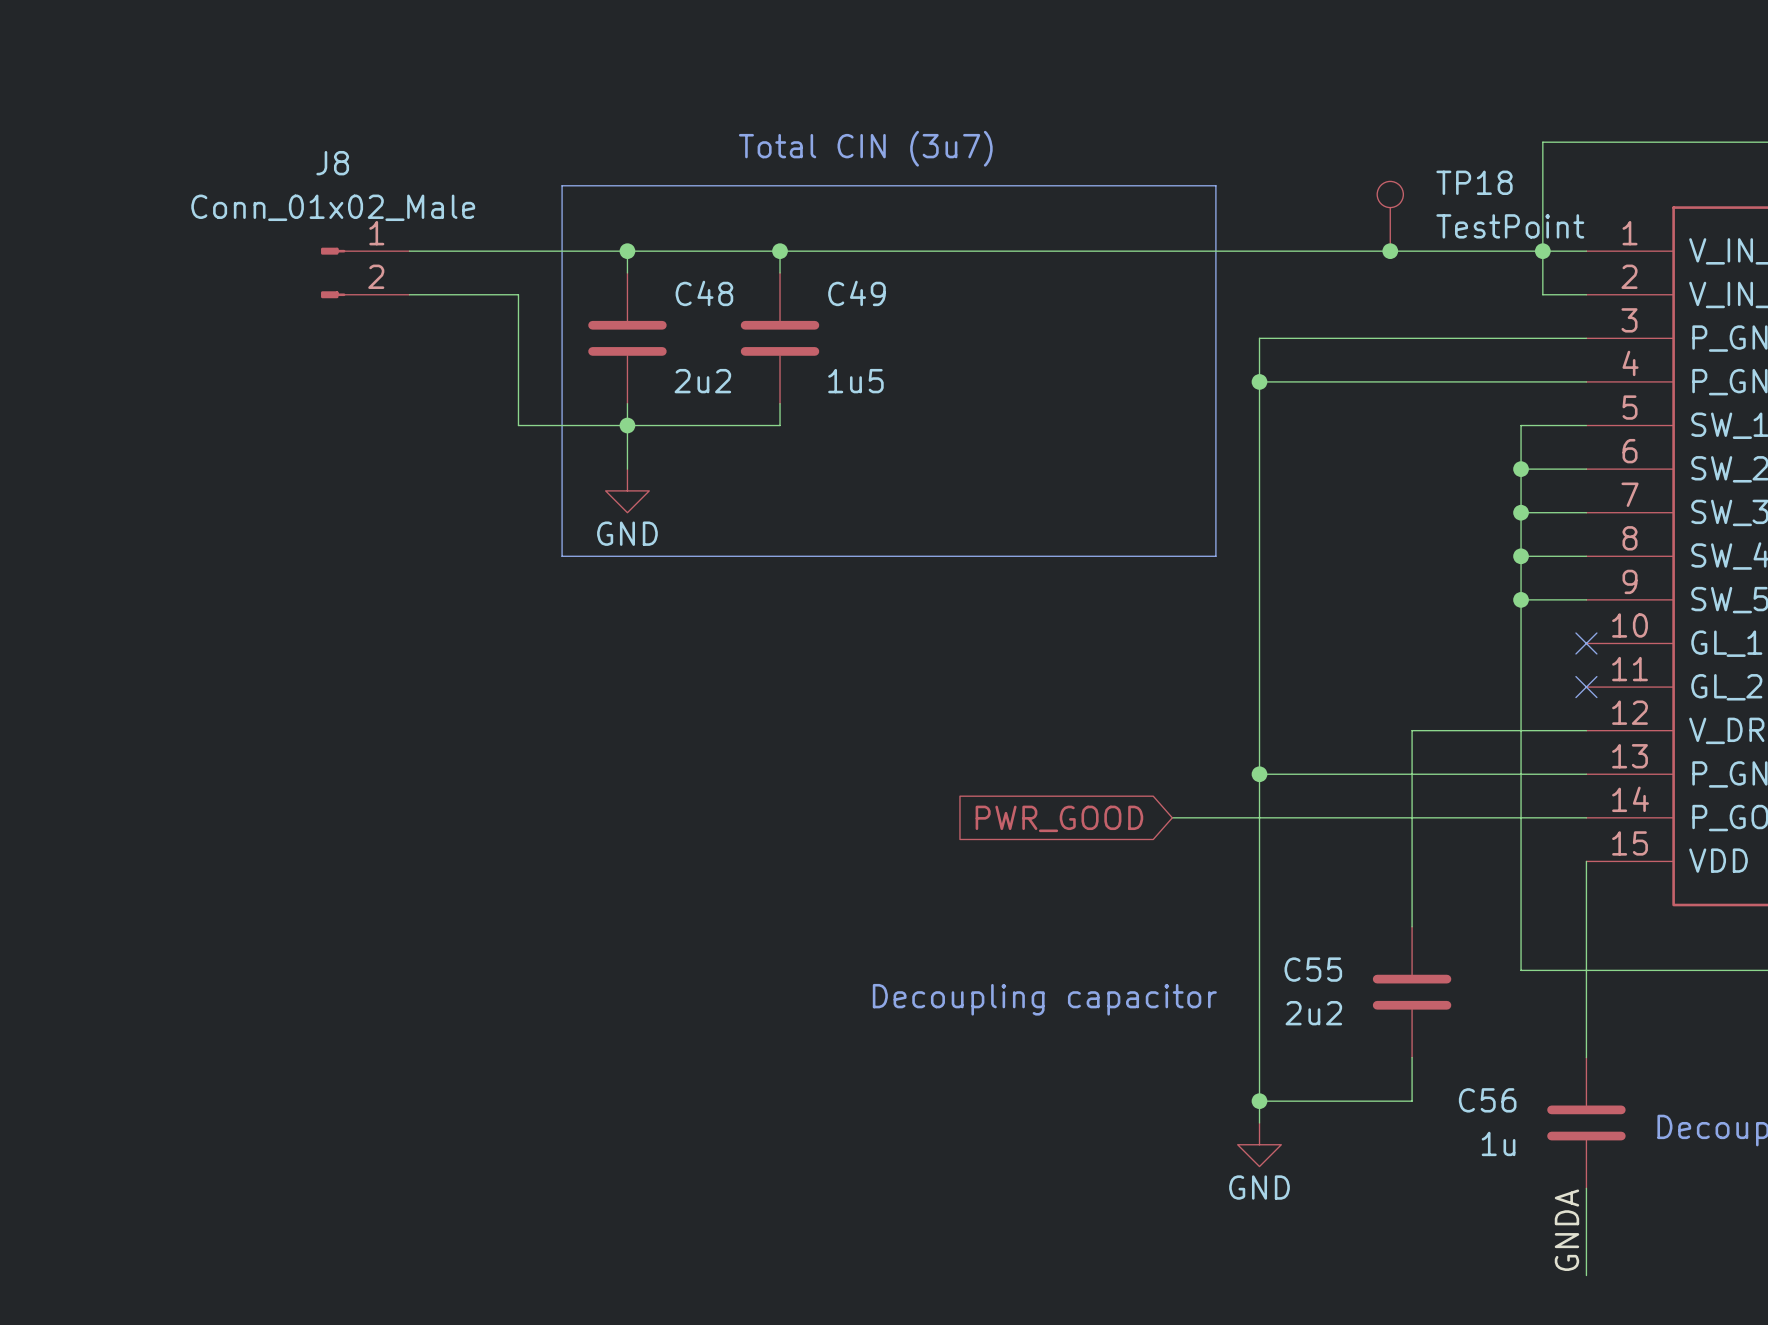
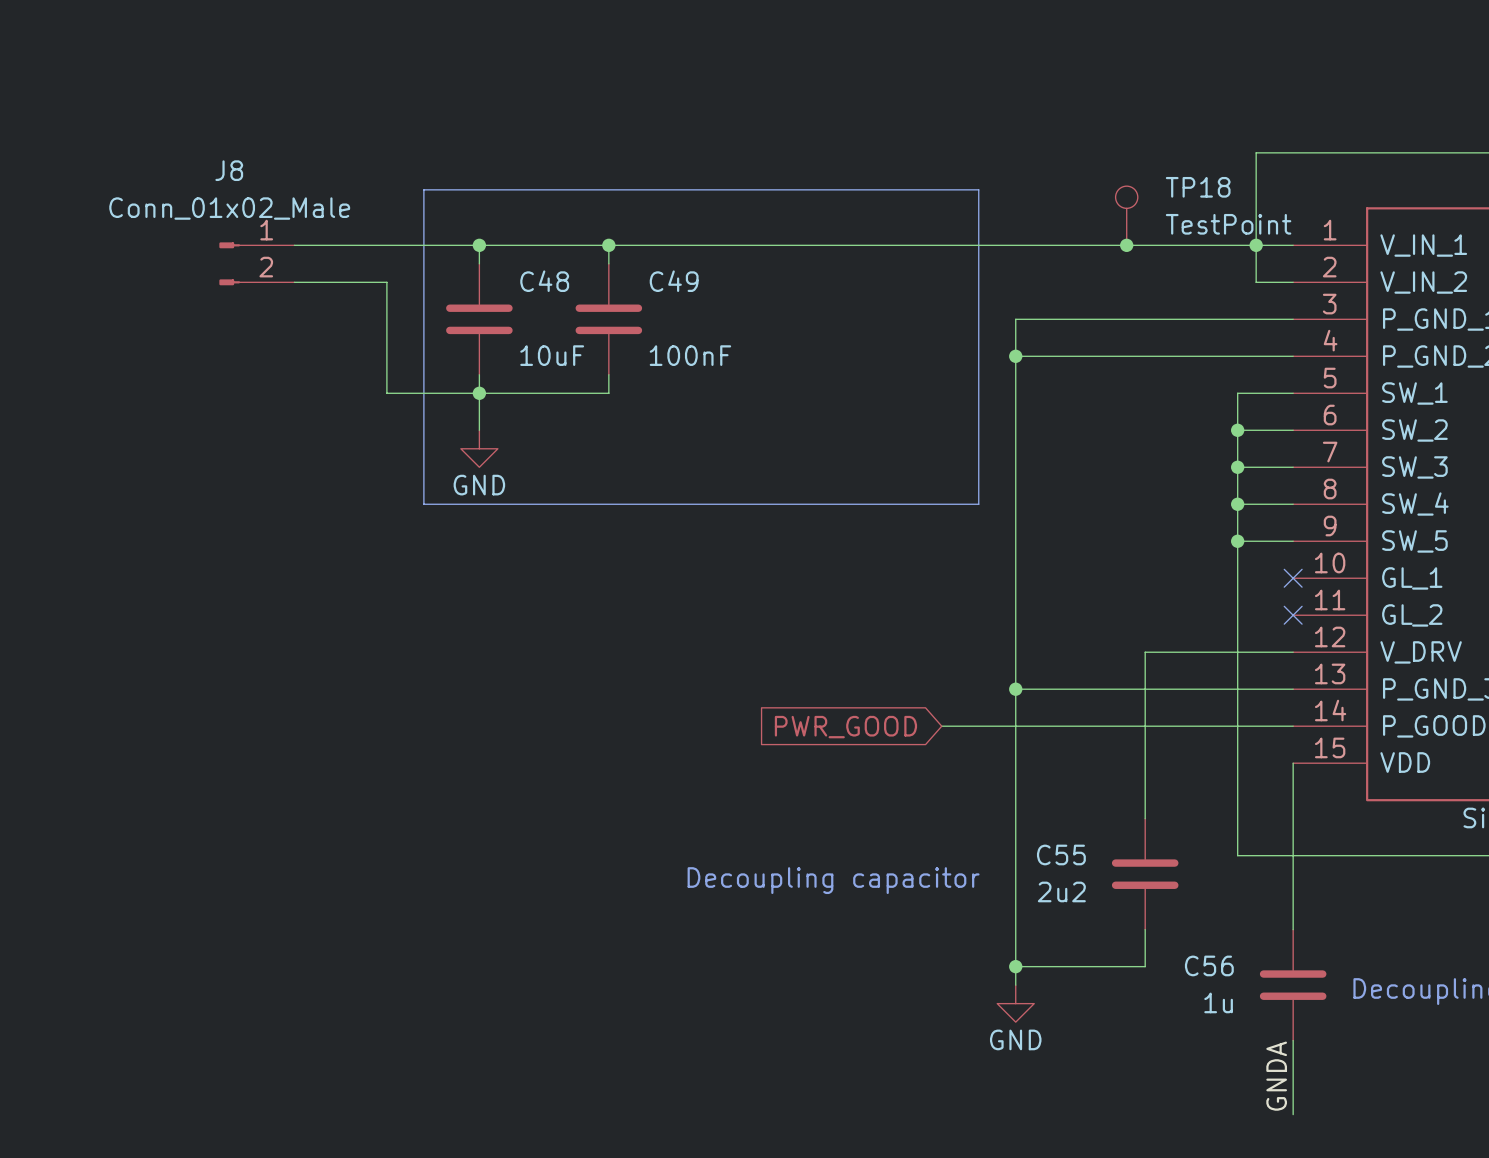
text: Total CIN (3u7) (865, 148) -> none
C48 value: 2u2 (702, 381) -> 10uF (552, 355)
C49 value: 1u5 (855, 381) -> 100nF (690, 355)

